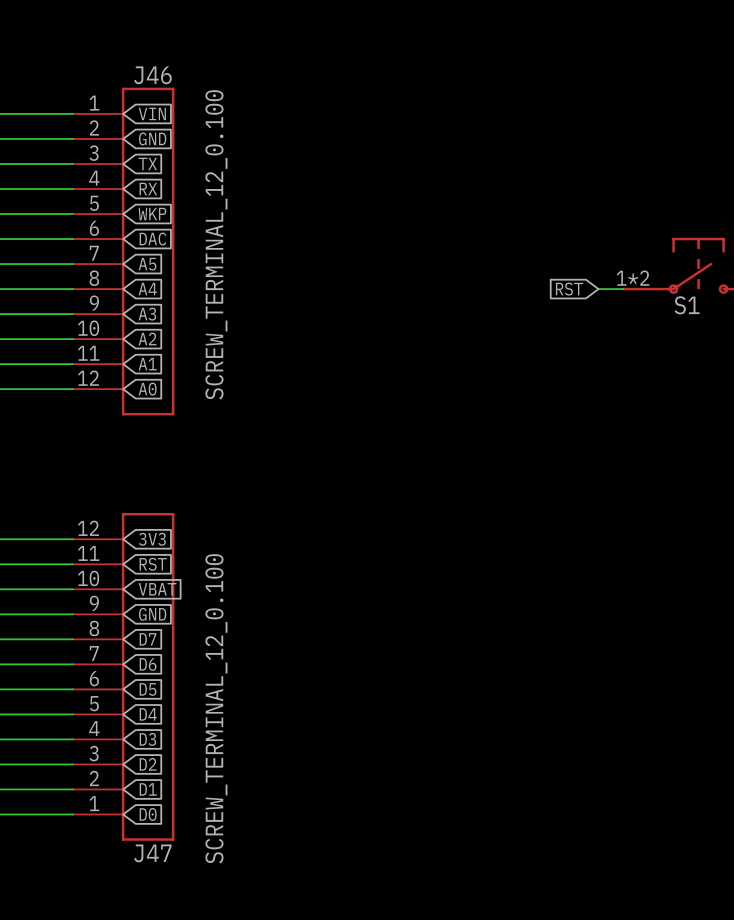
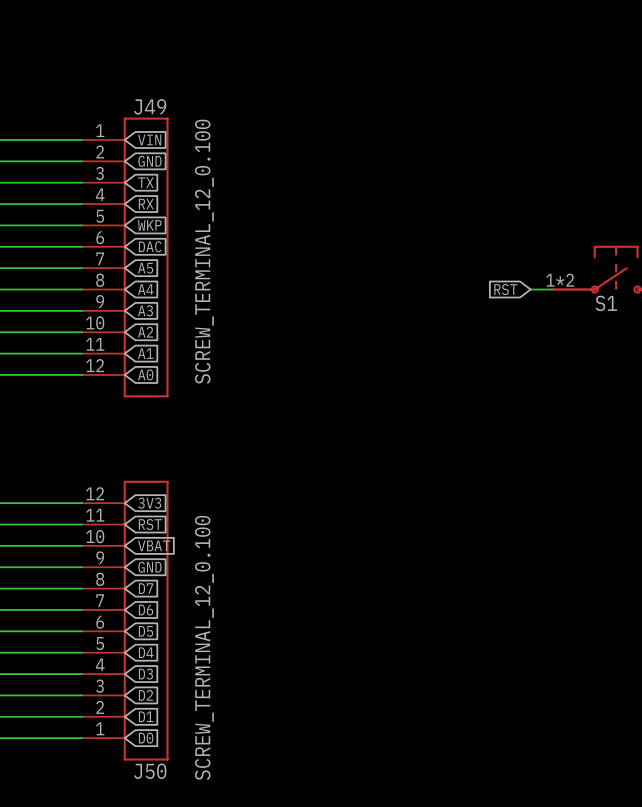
J46 name: J46 (152, 75) -> J49 (150, 106)
J47 name: J47 (152, 853) -> J50 (150, 771)

